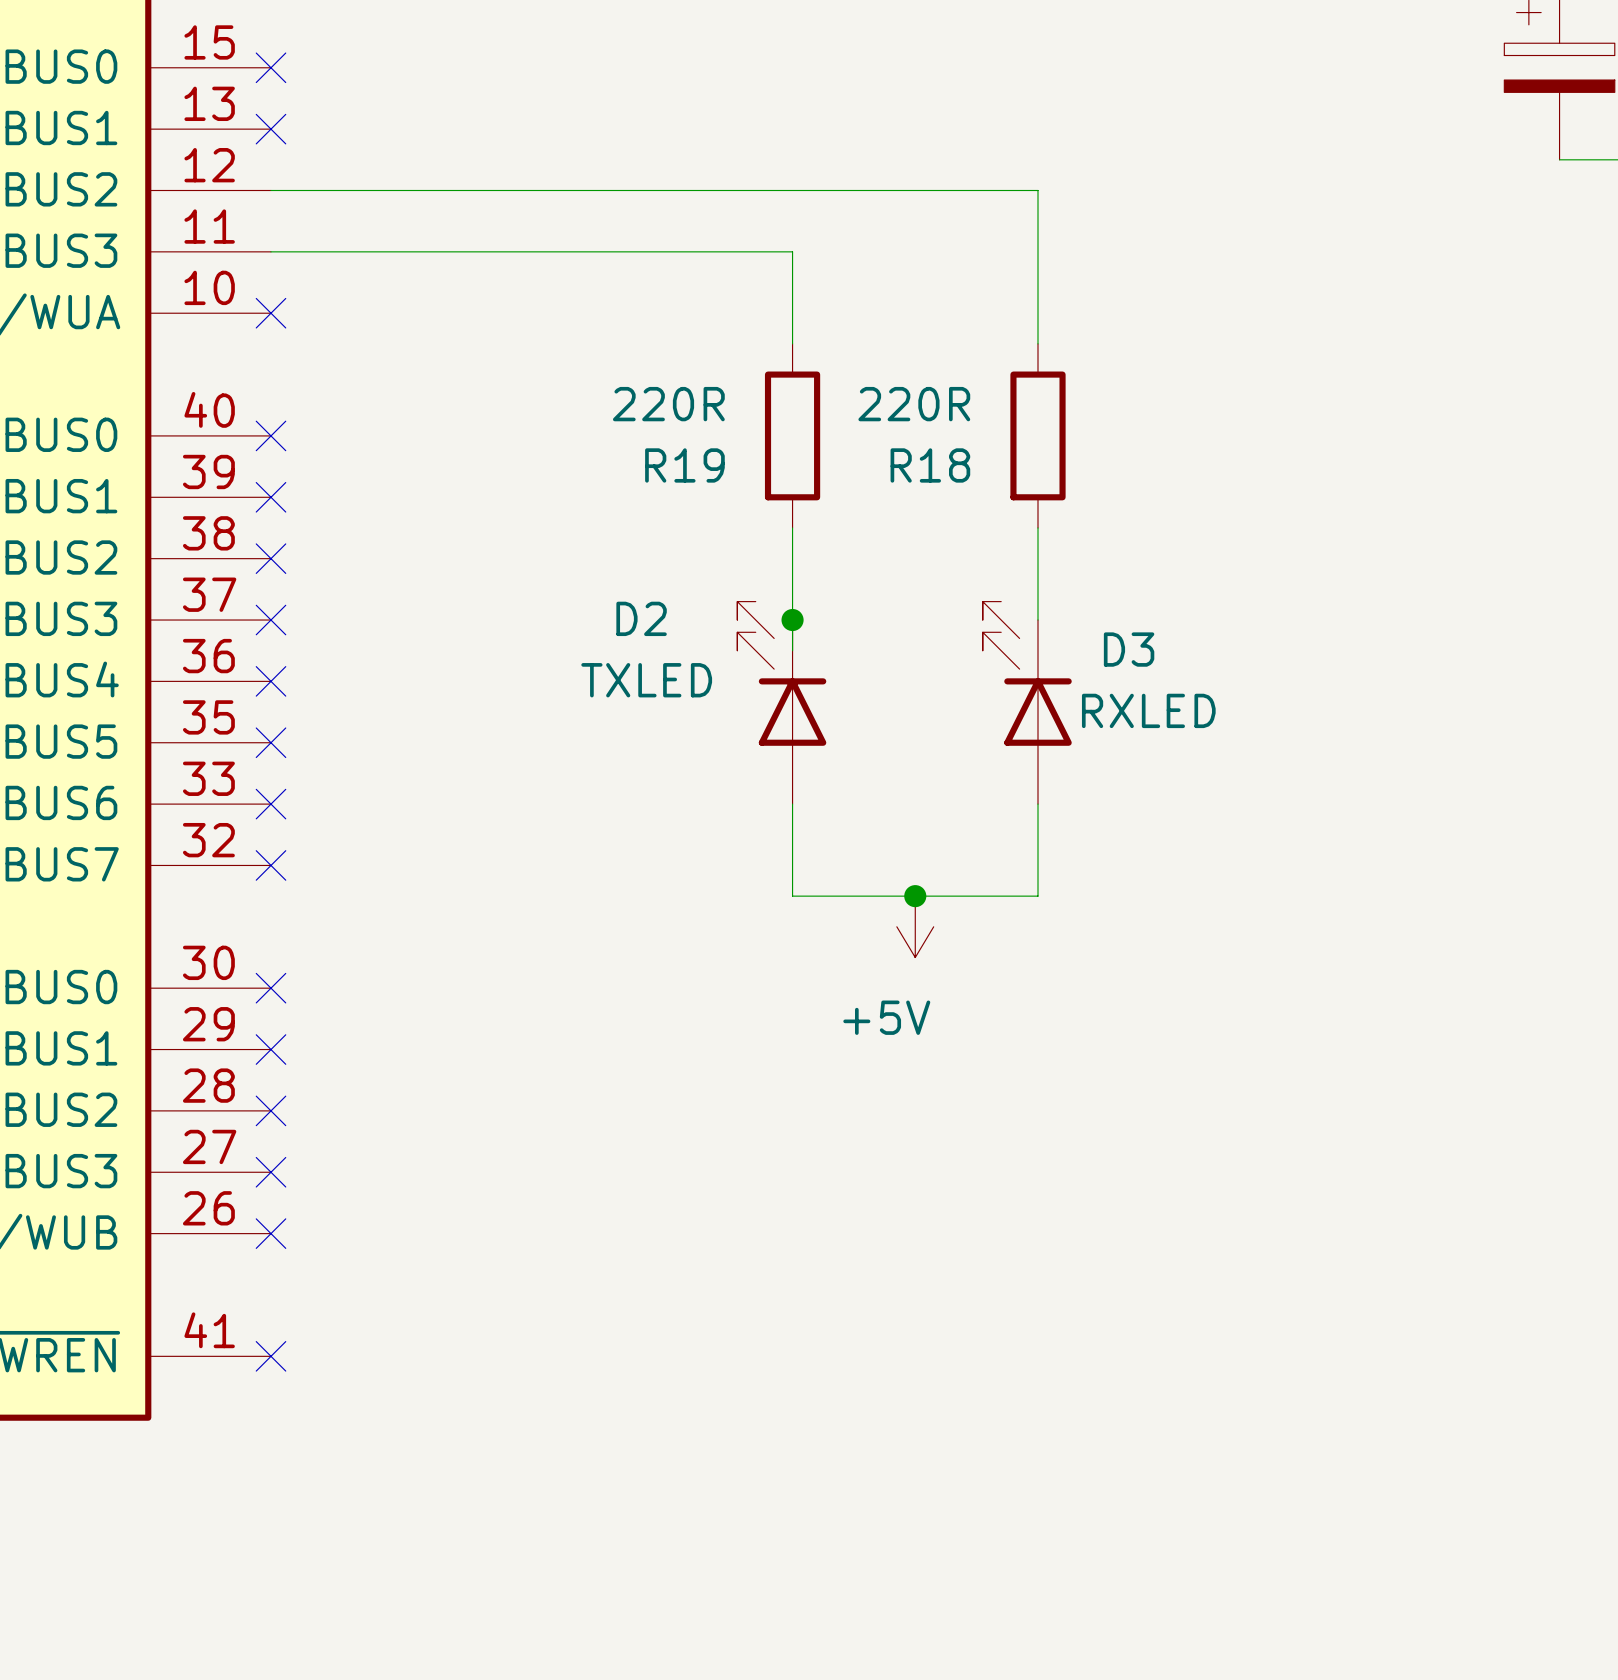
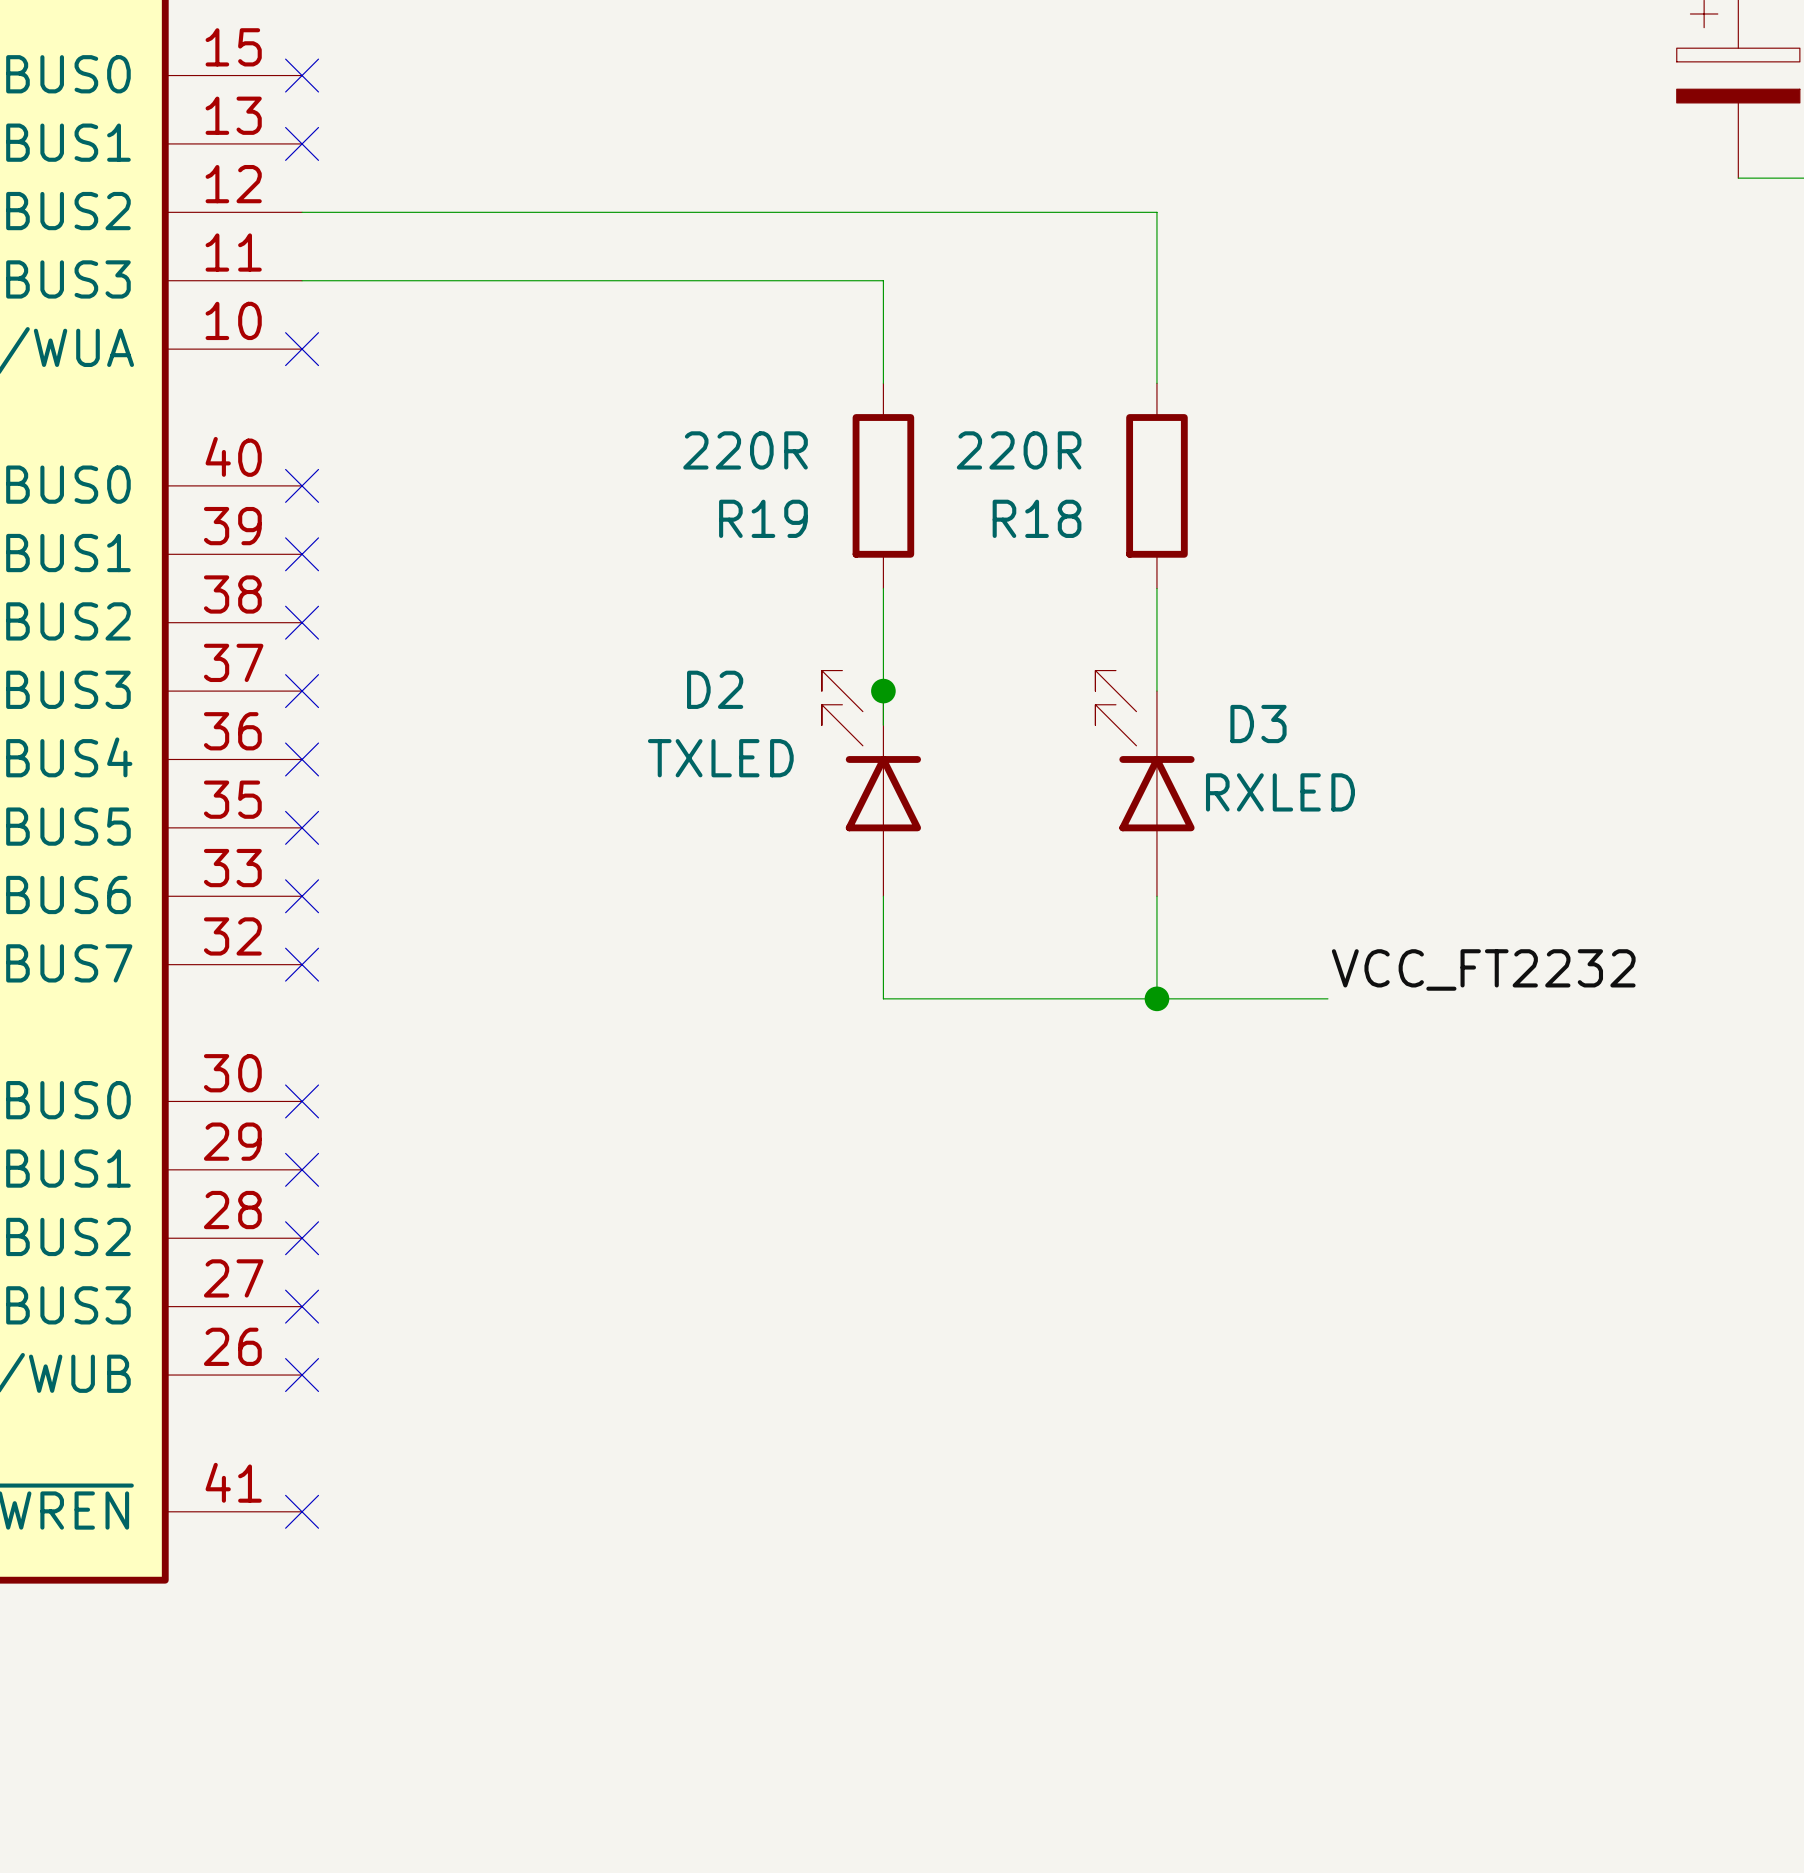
label: none -> VCC_FT2232 (1483, 969)
junction position: (915, 896) -> (1156, 998)
wire: none -> (1156, 998) (1327, 998)
power symbol: +5V (915, 926) -> none

